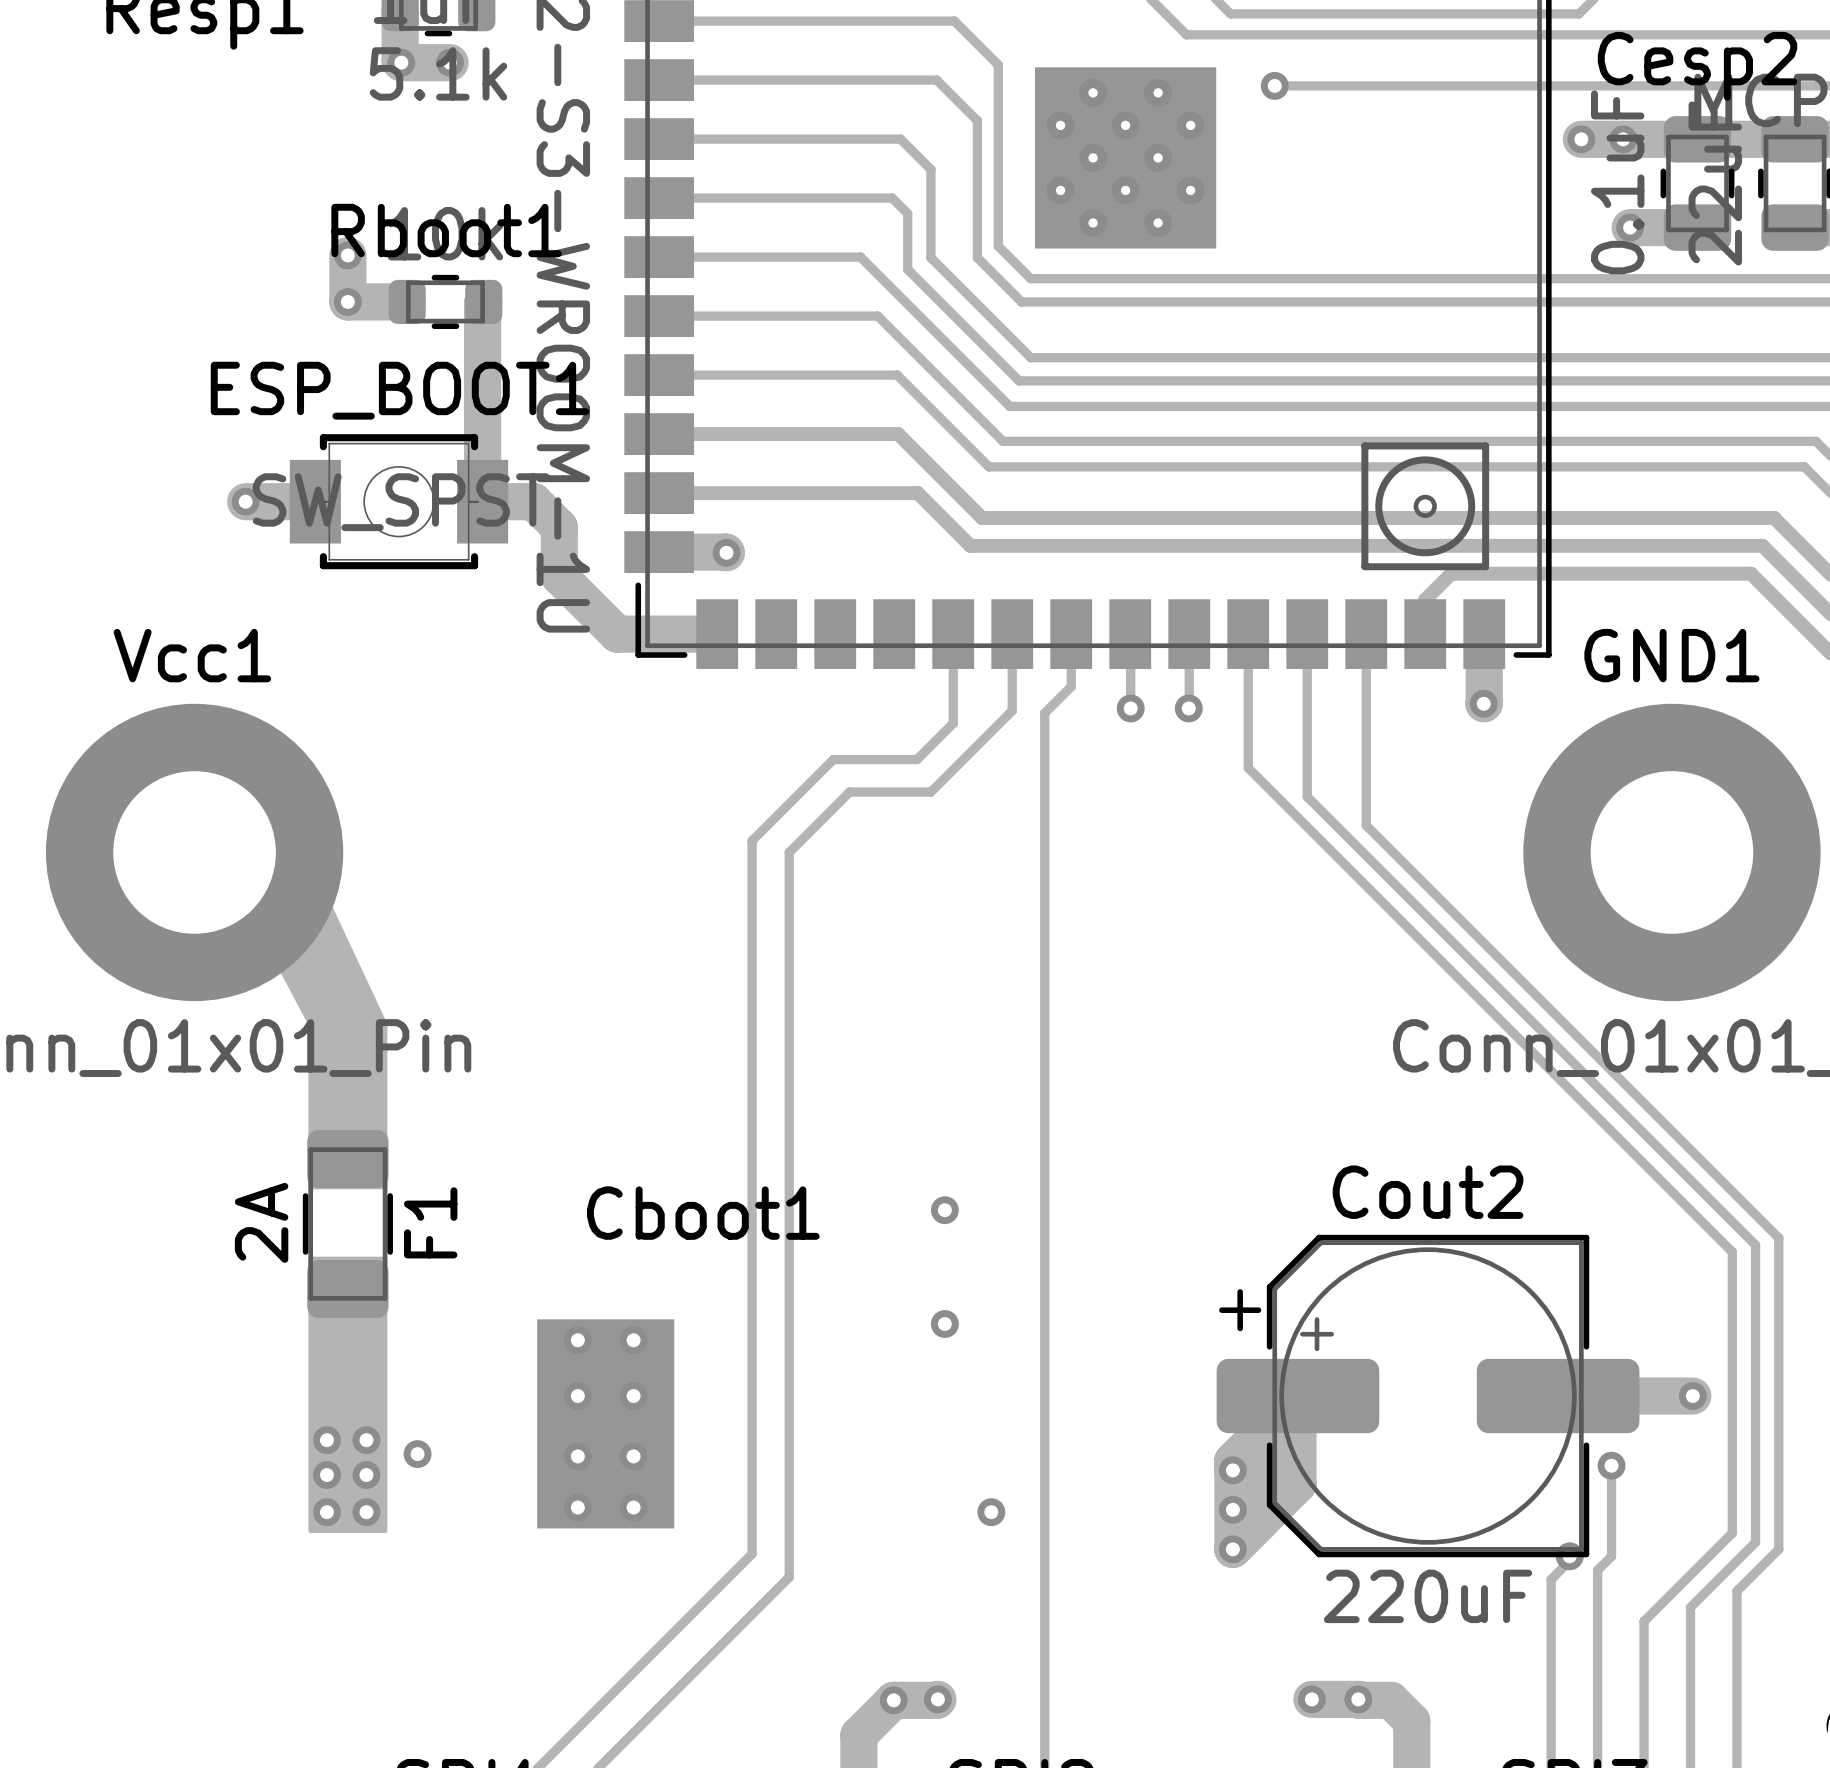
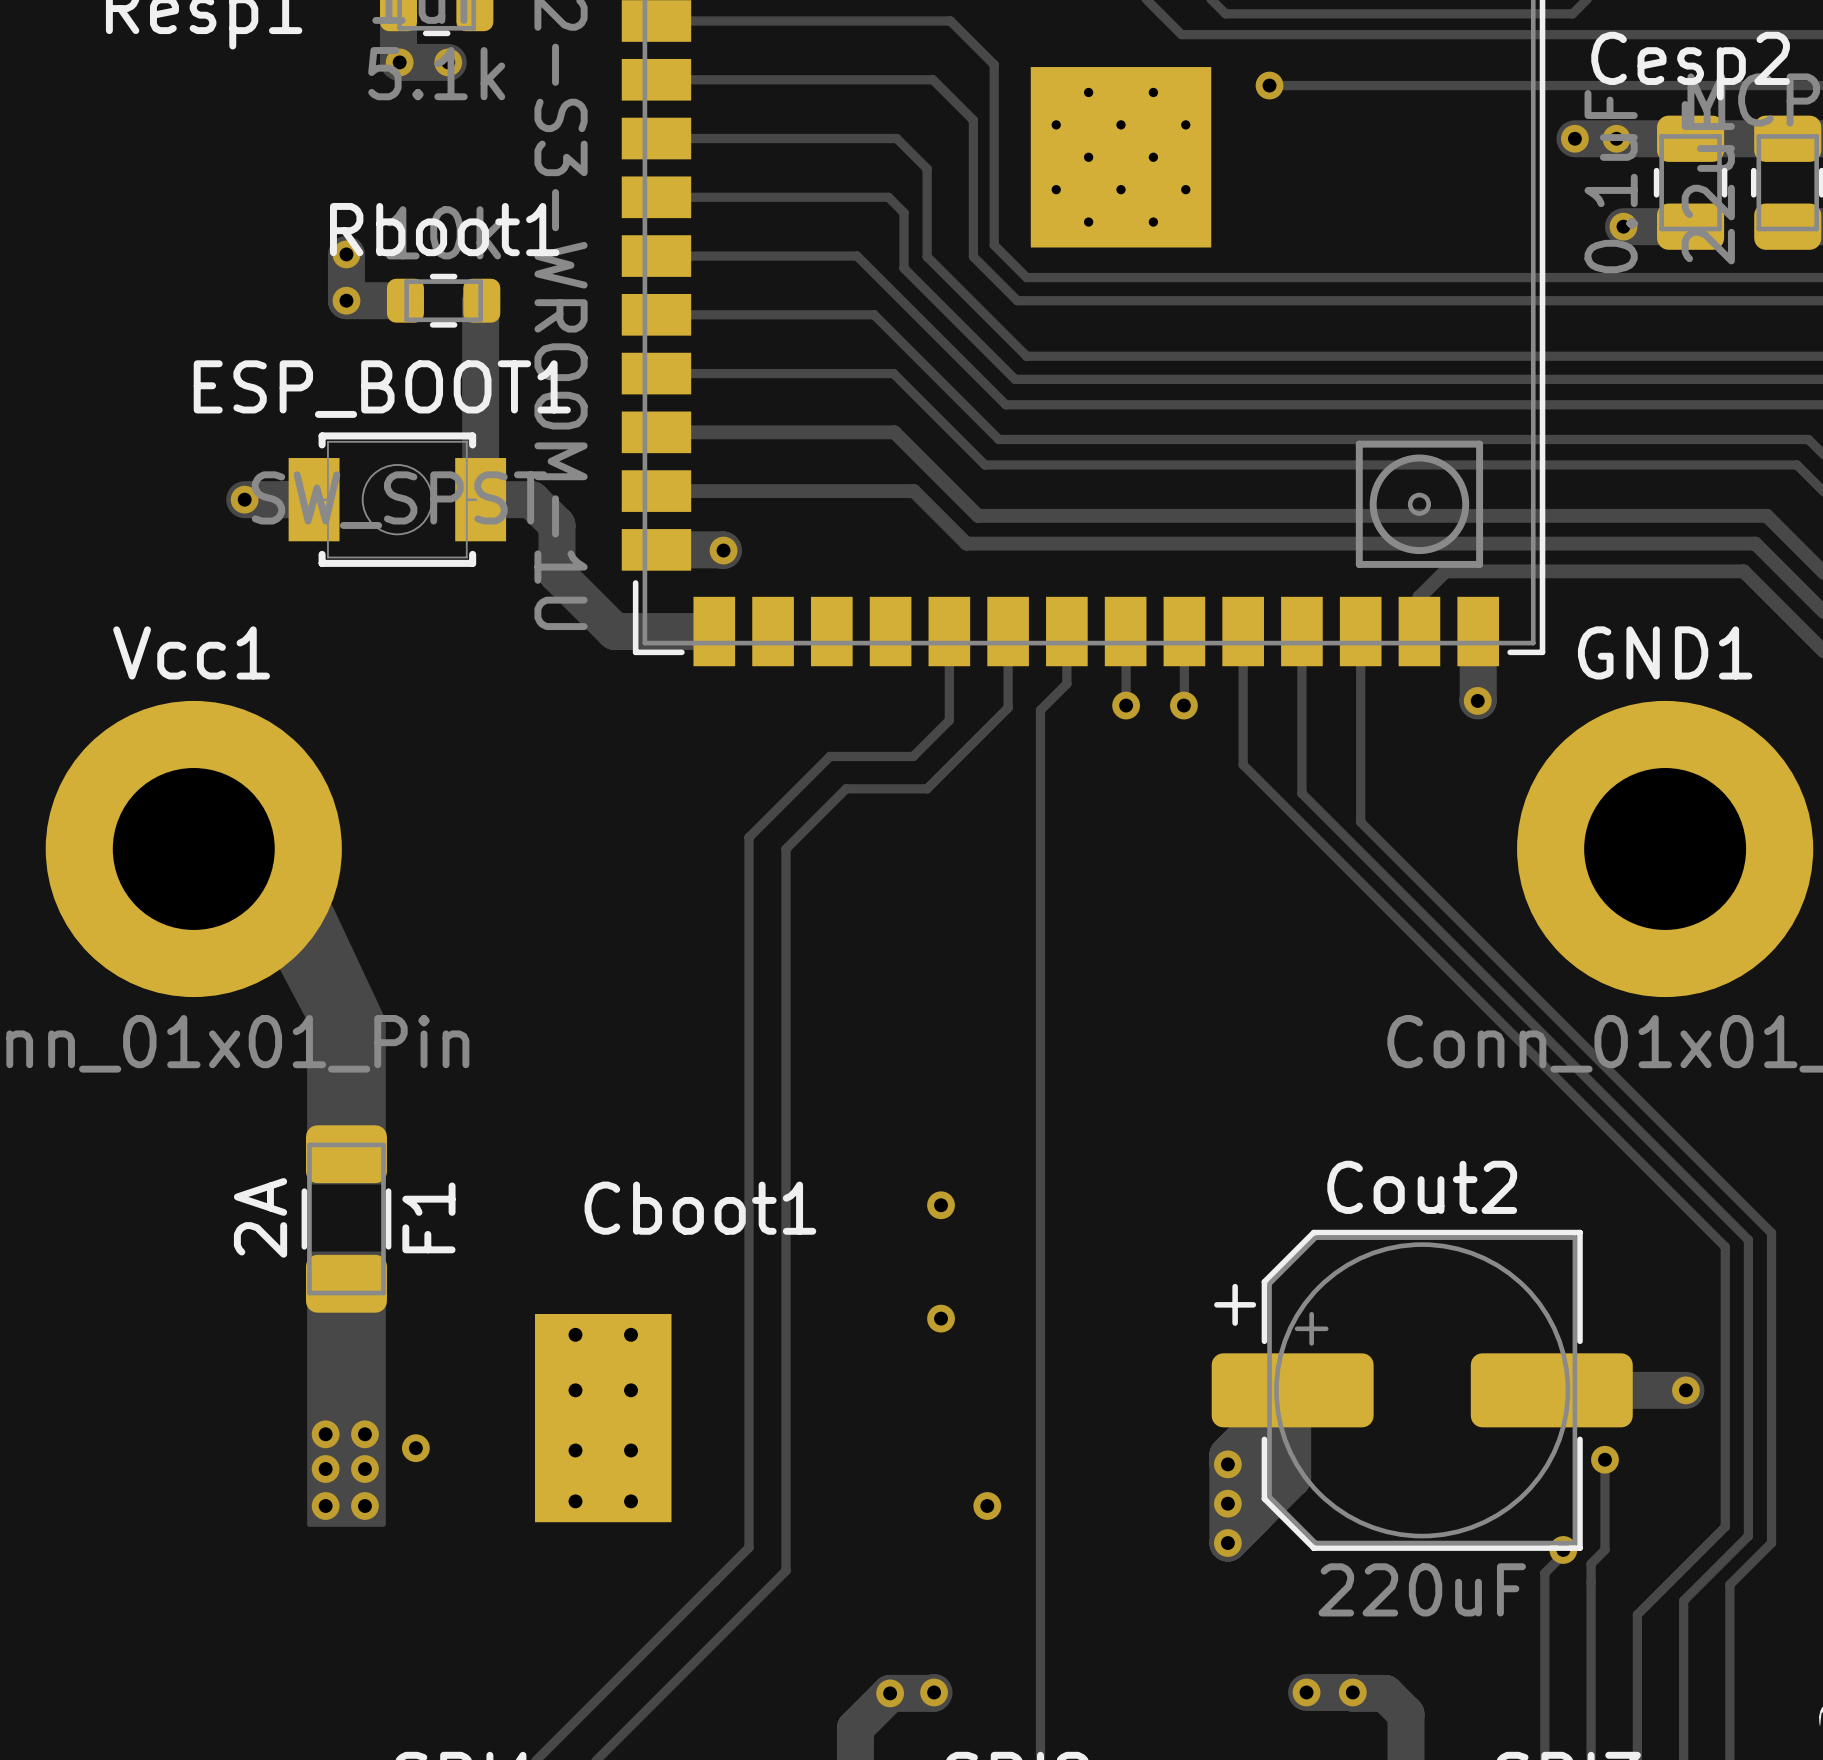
ESP_BOOT1 name position: ESP_BOOT1 (400, 390) -> ESP_BOOT1 (382, 389)

